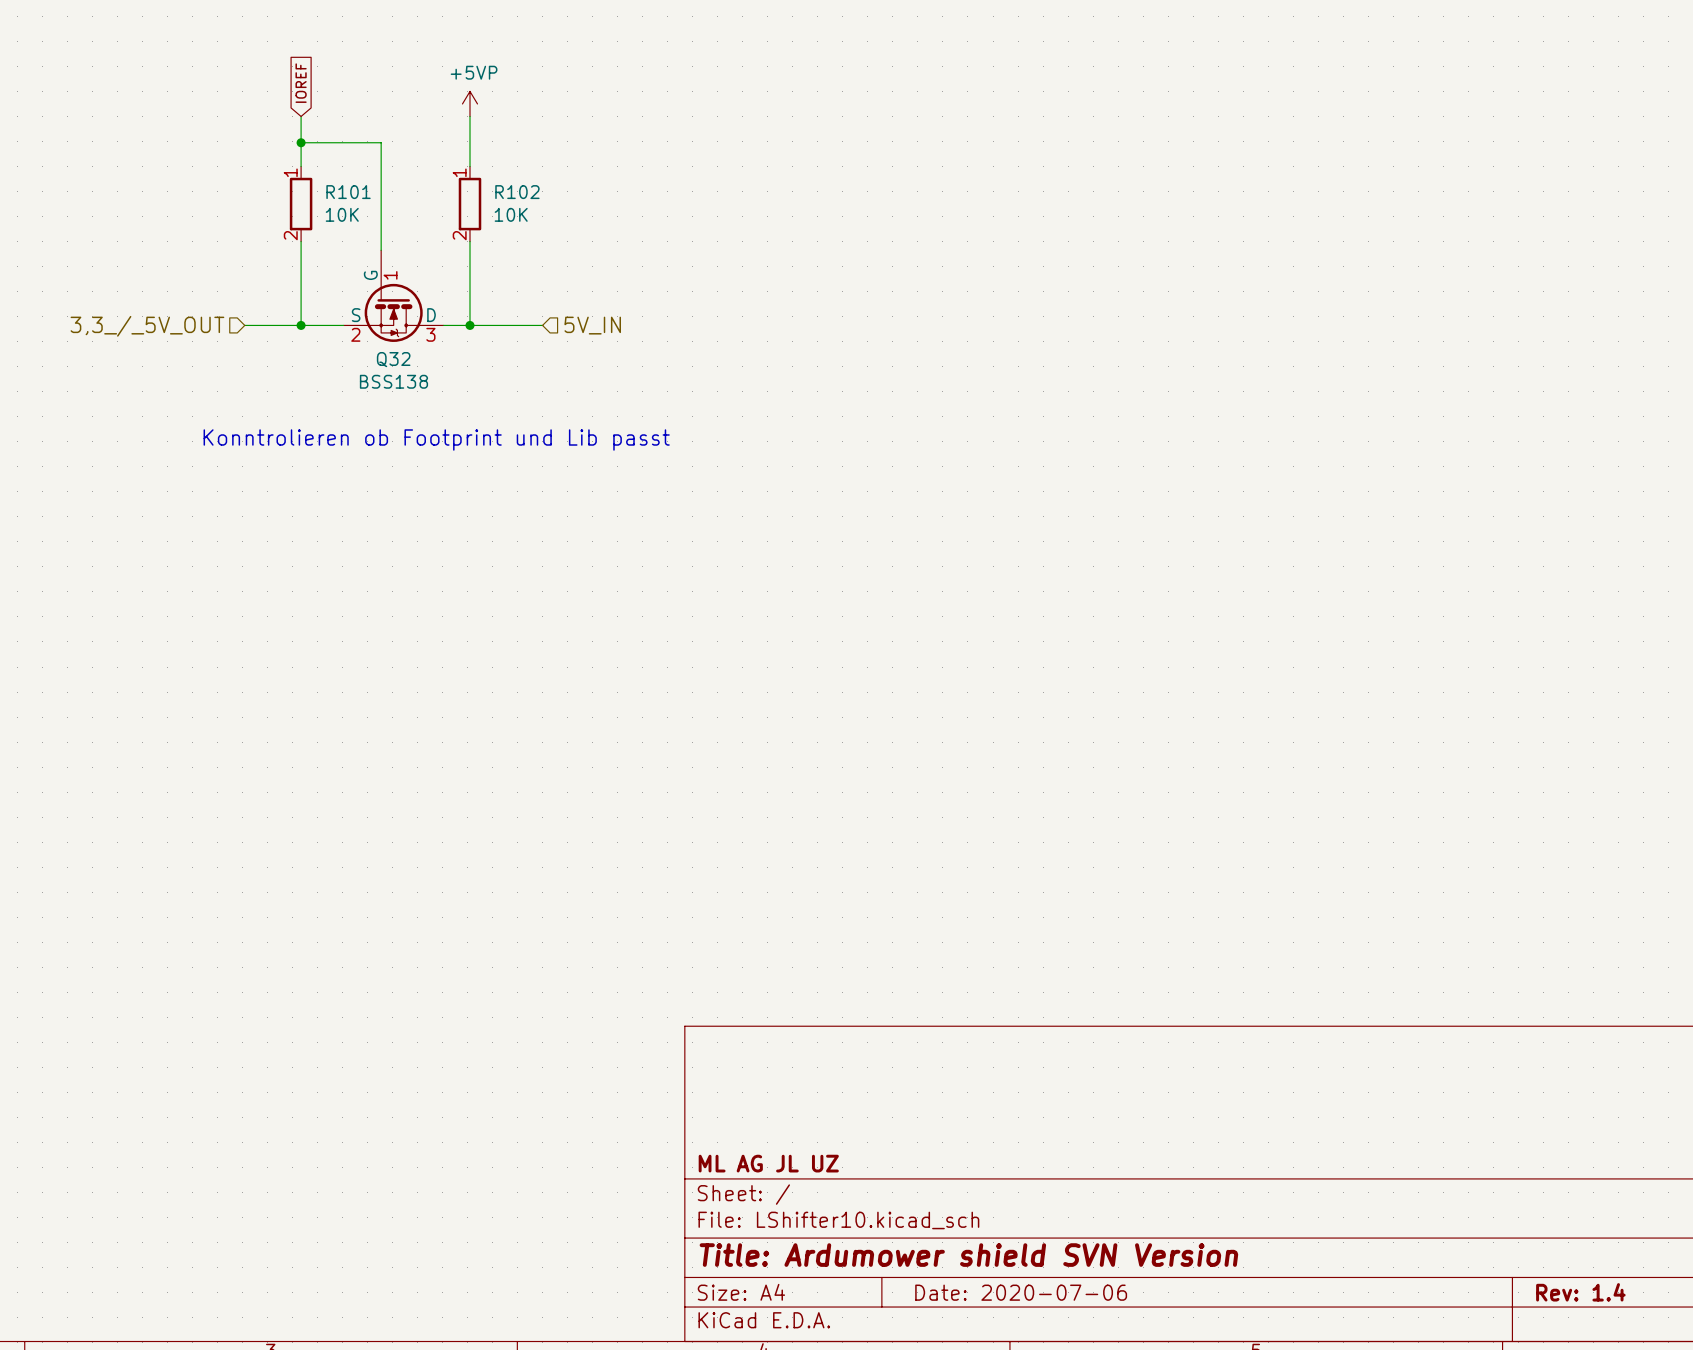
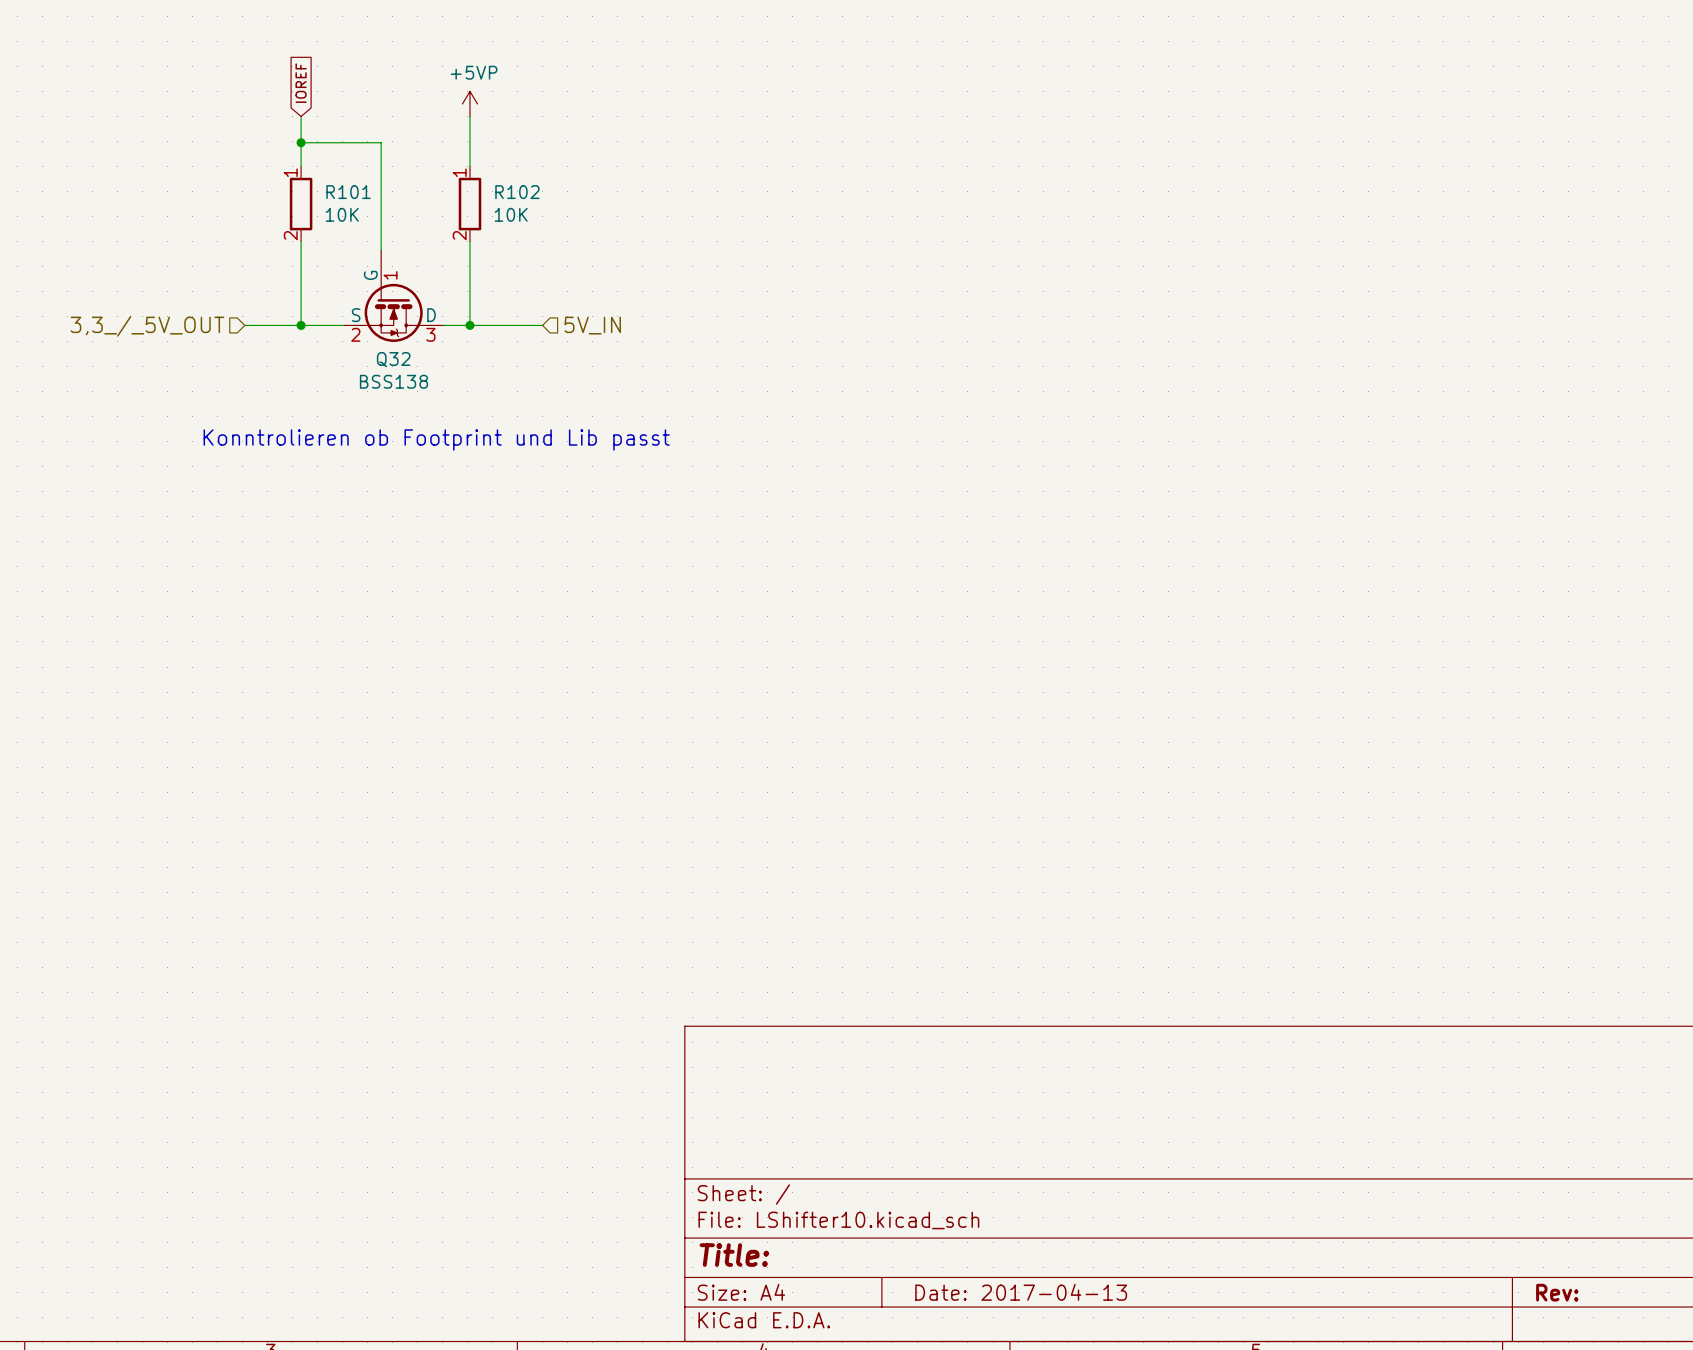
title block: ML AG JL UZ (768, 1163) -> none
title block: Title: Ardumower shield SVN Version (968, 1255) -> Title: (734, 1255)
title block: Date: 2020-07-06 (1021, 1292) -> Date: 2017-04-13 (1021, 1292)
title block: Rev: 1.4 (1580, 1292) -> Rev: (1557, 1292)

